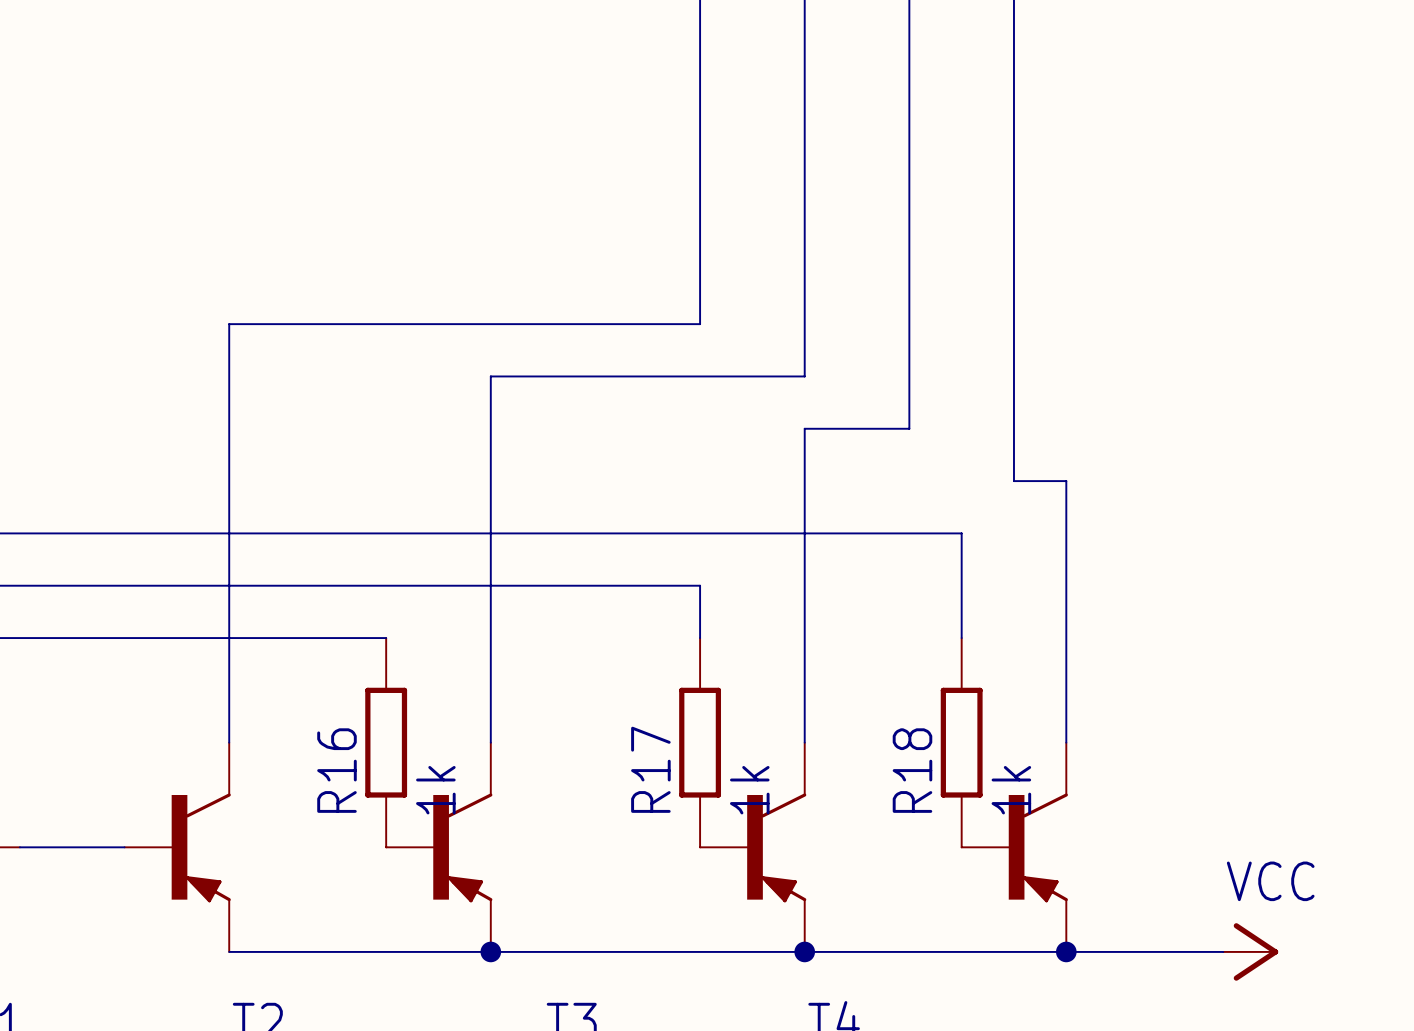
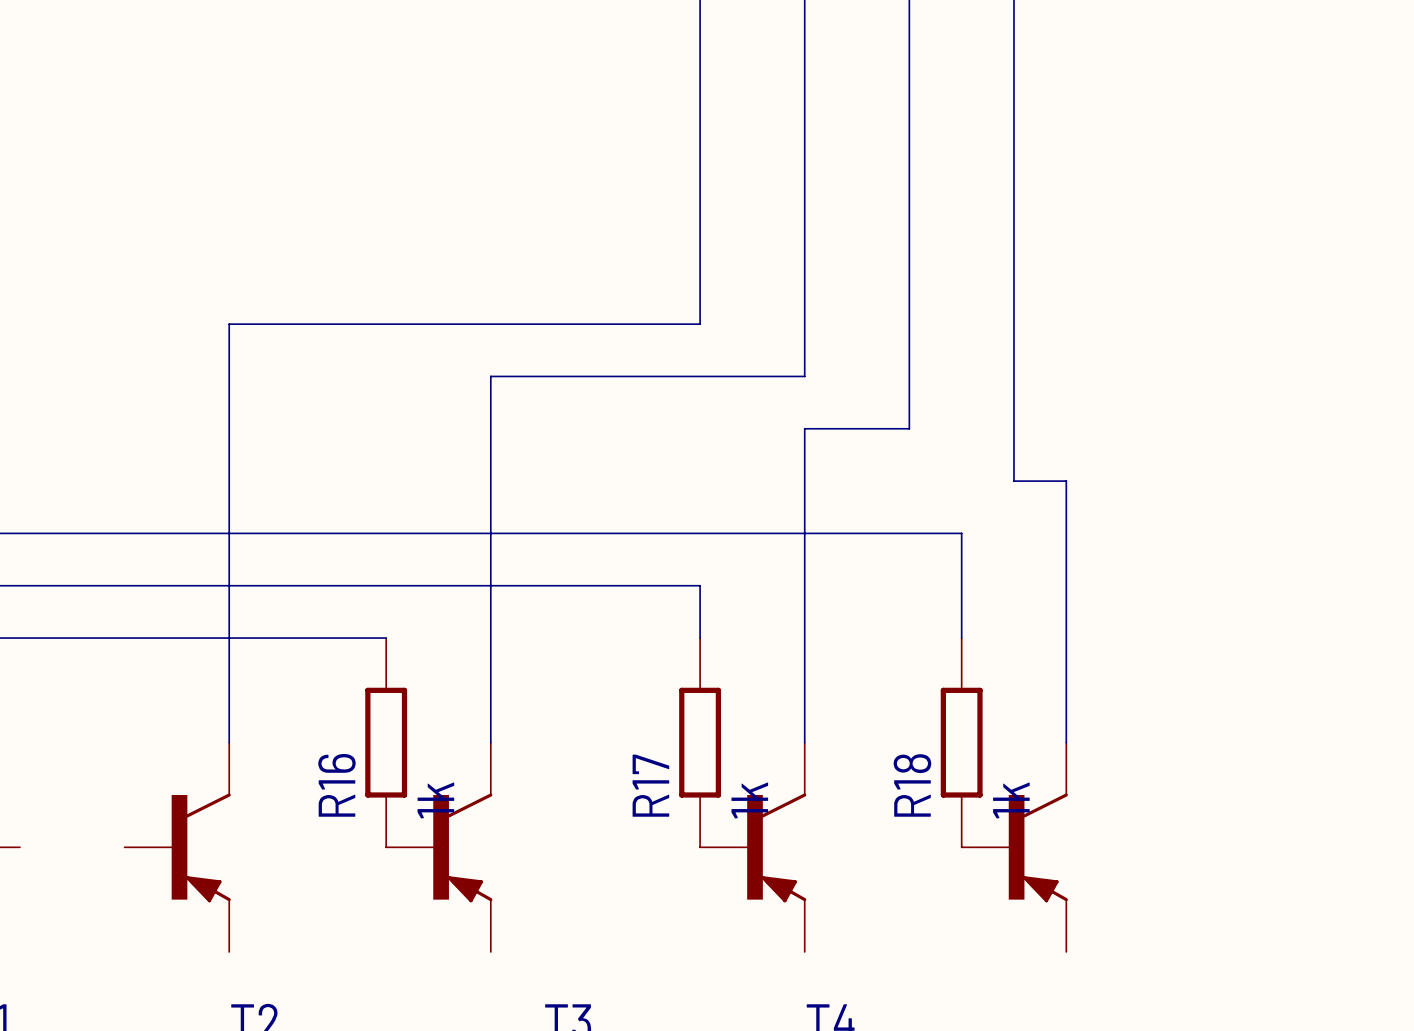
wire: (19, 847) (124, 847) -> none
wire: (229, 951) (1223, 951) -> none
junction: (490, 951) -> none
junction: (804, 951) -> none
junction: (1066, 951) -> none
power symbol: VCC (1250, 951) -> none

